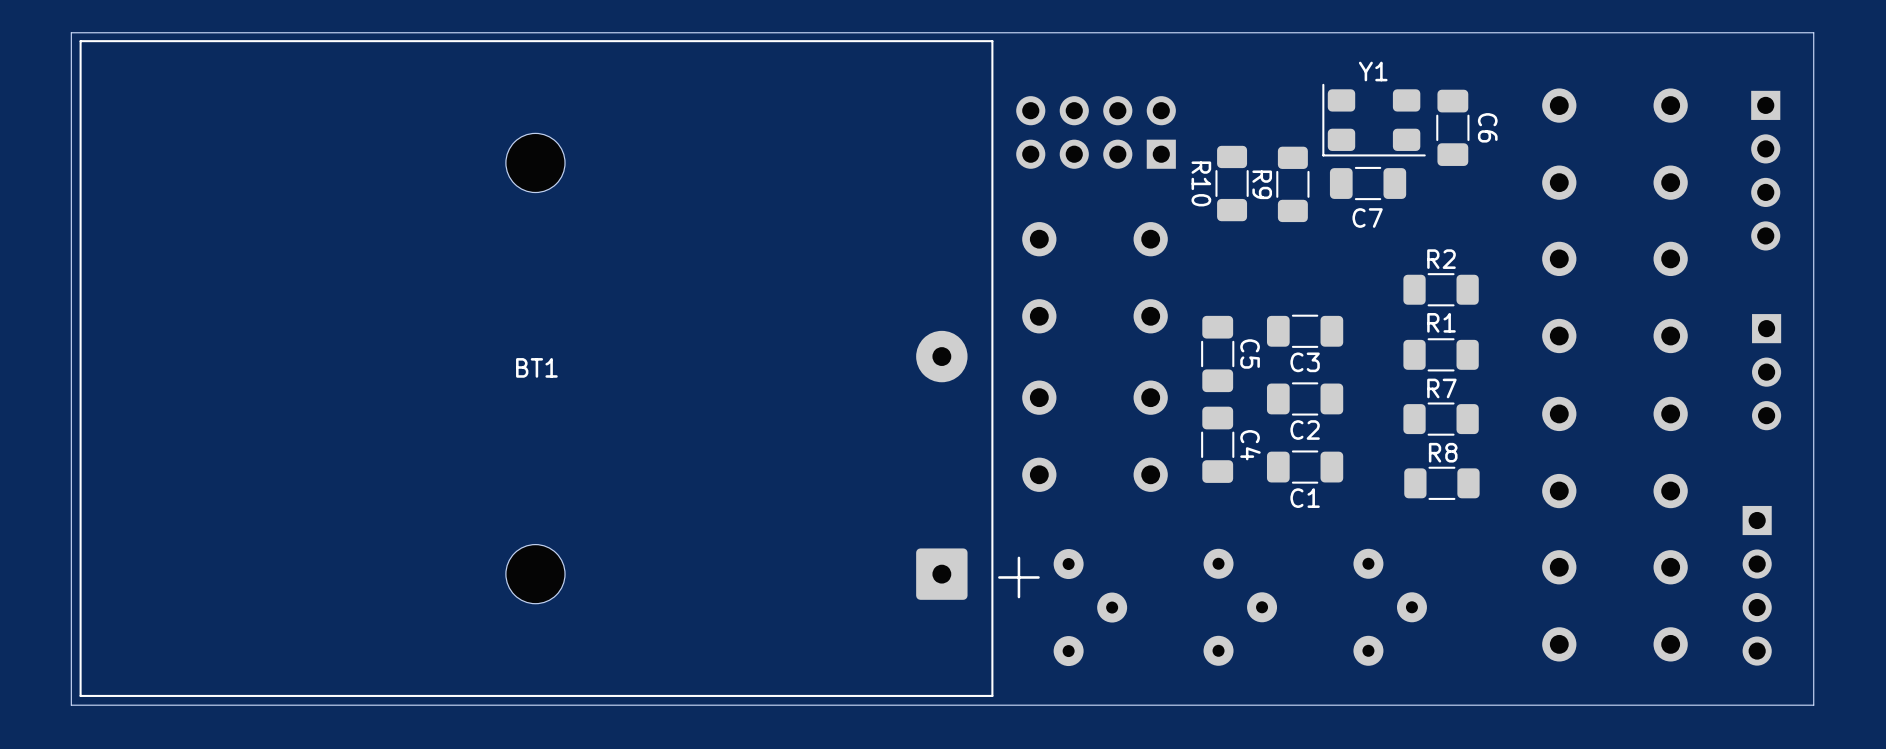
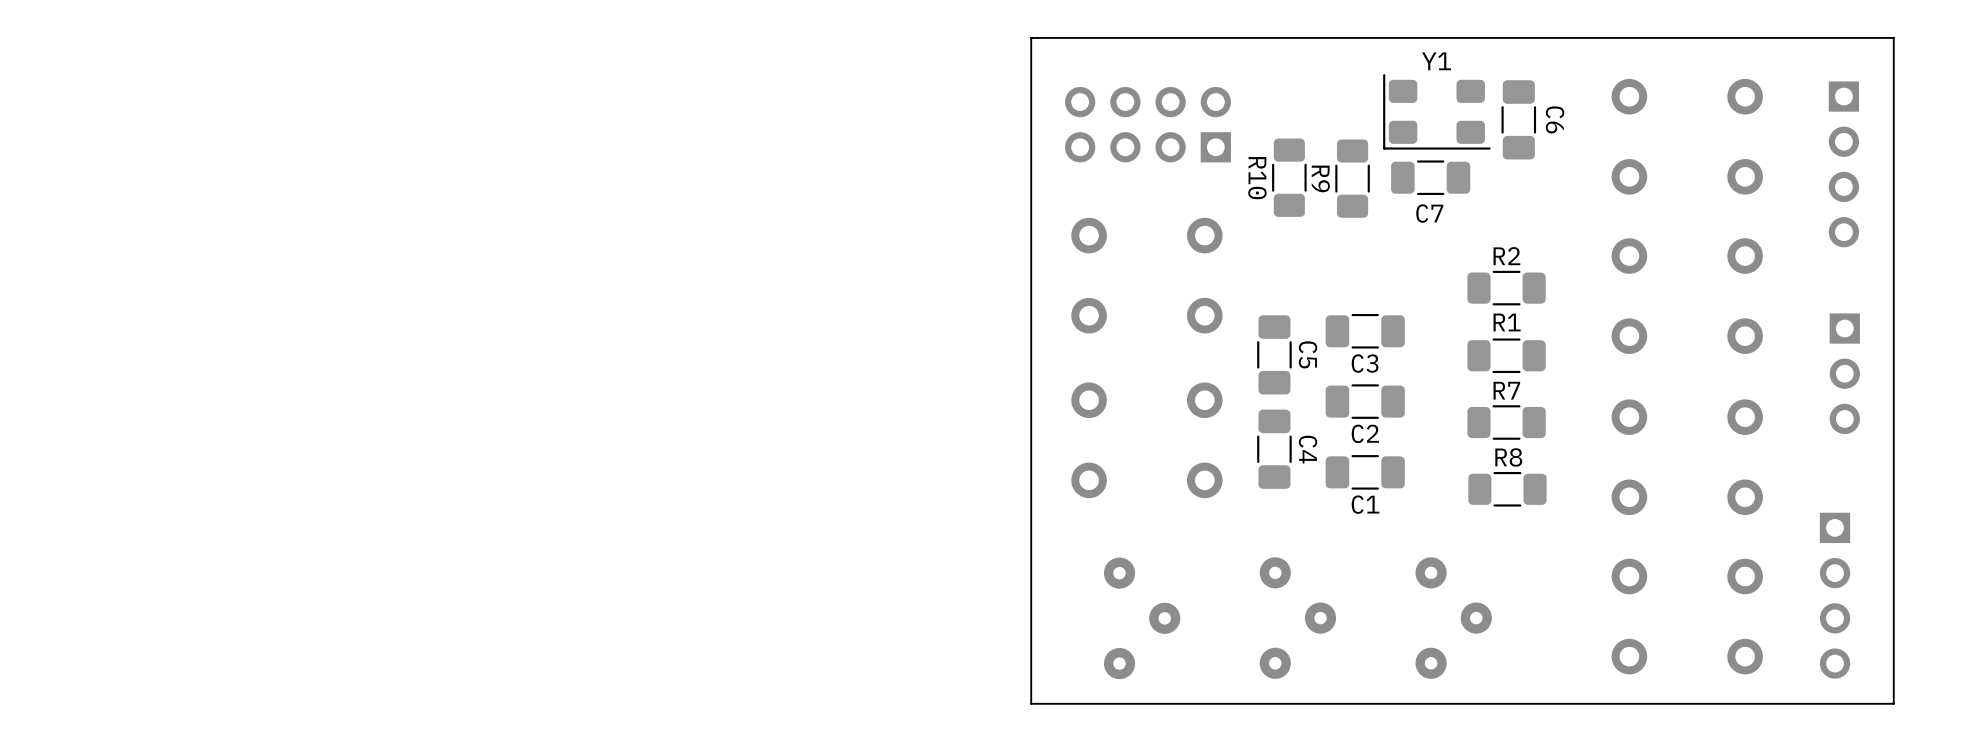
board edge: (1813, 49) (1813, 32) (71, 32) (71, 705) (1813, 705) (1813, 689) -> (1893, 37) (1031, 37) (1031, 703) (1893, 703)
BT1: (536, 368) -> none

